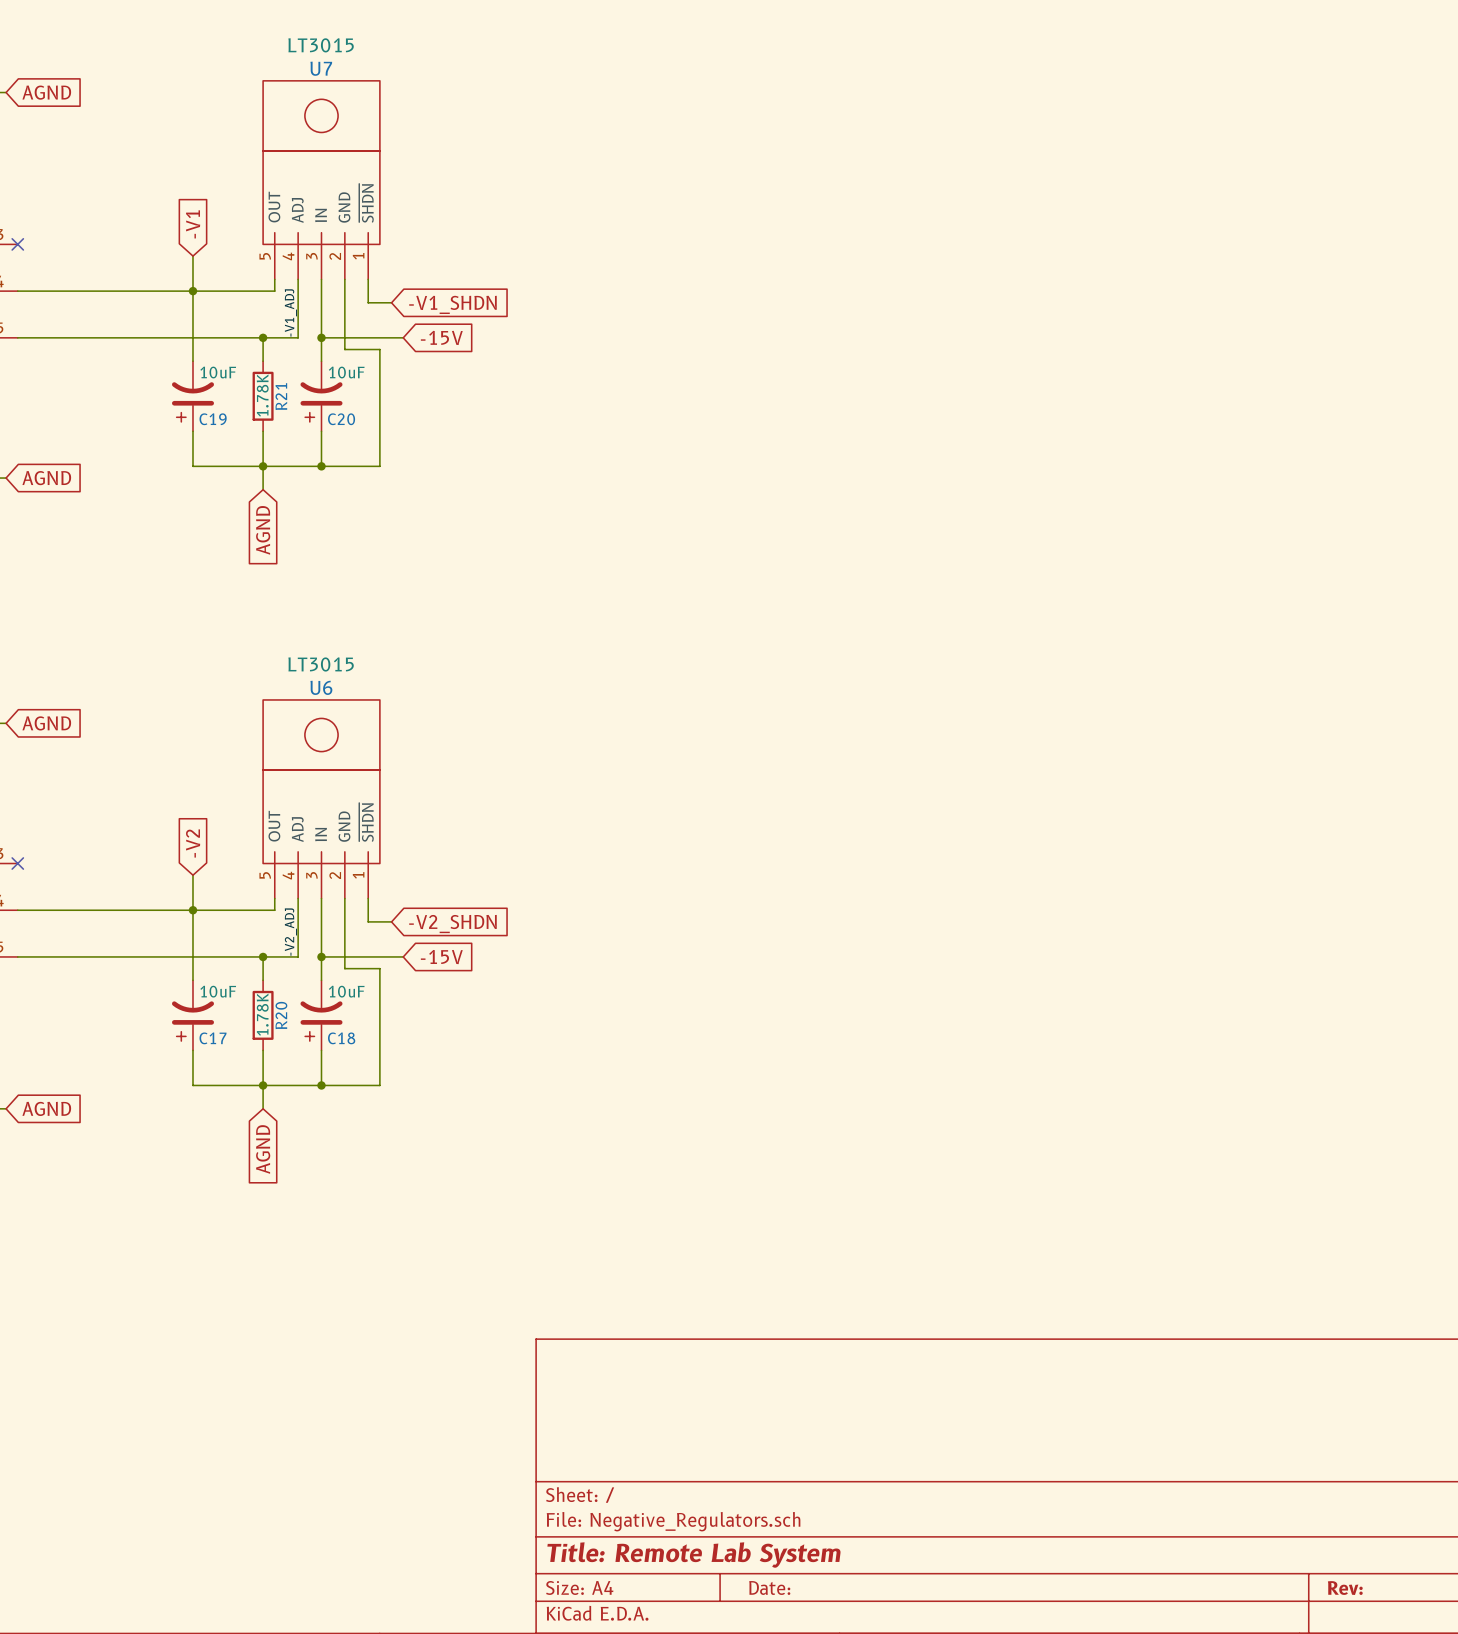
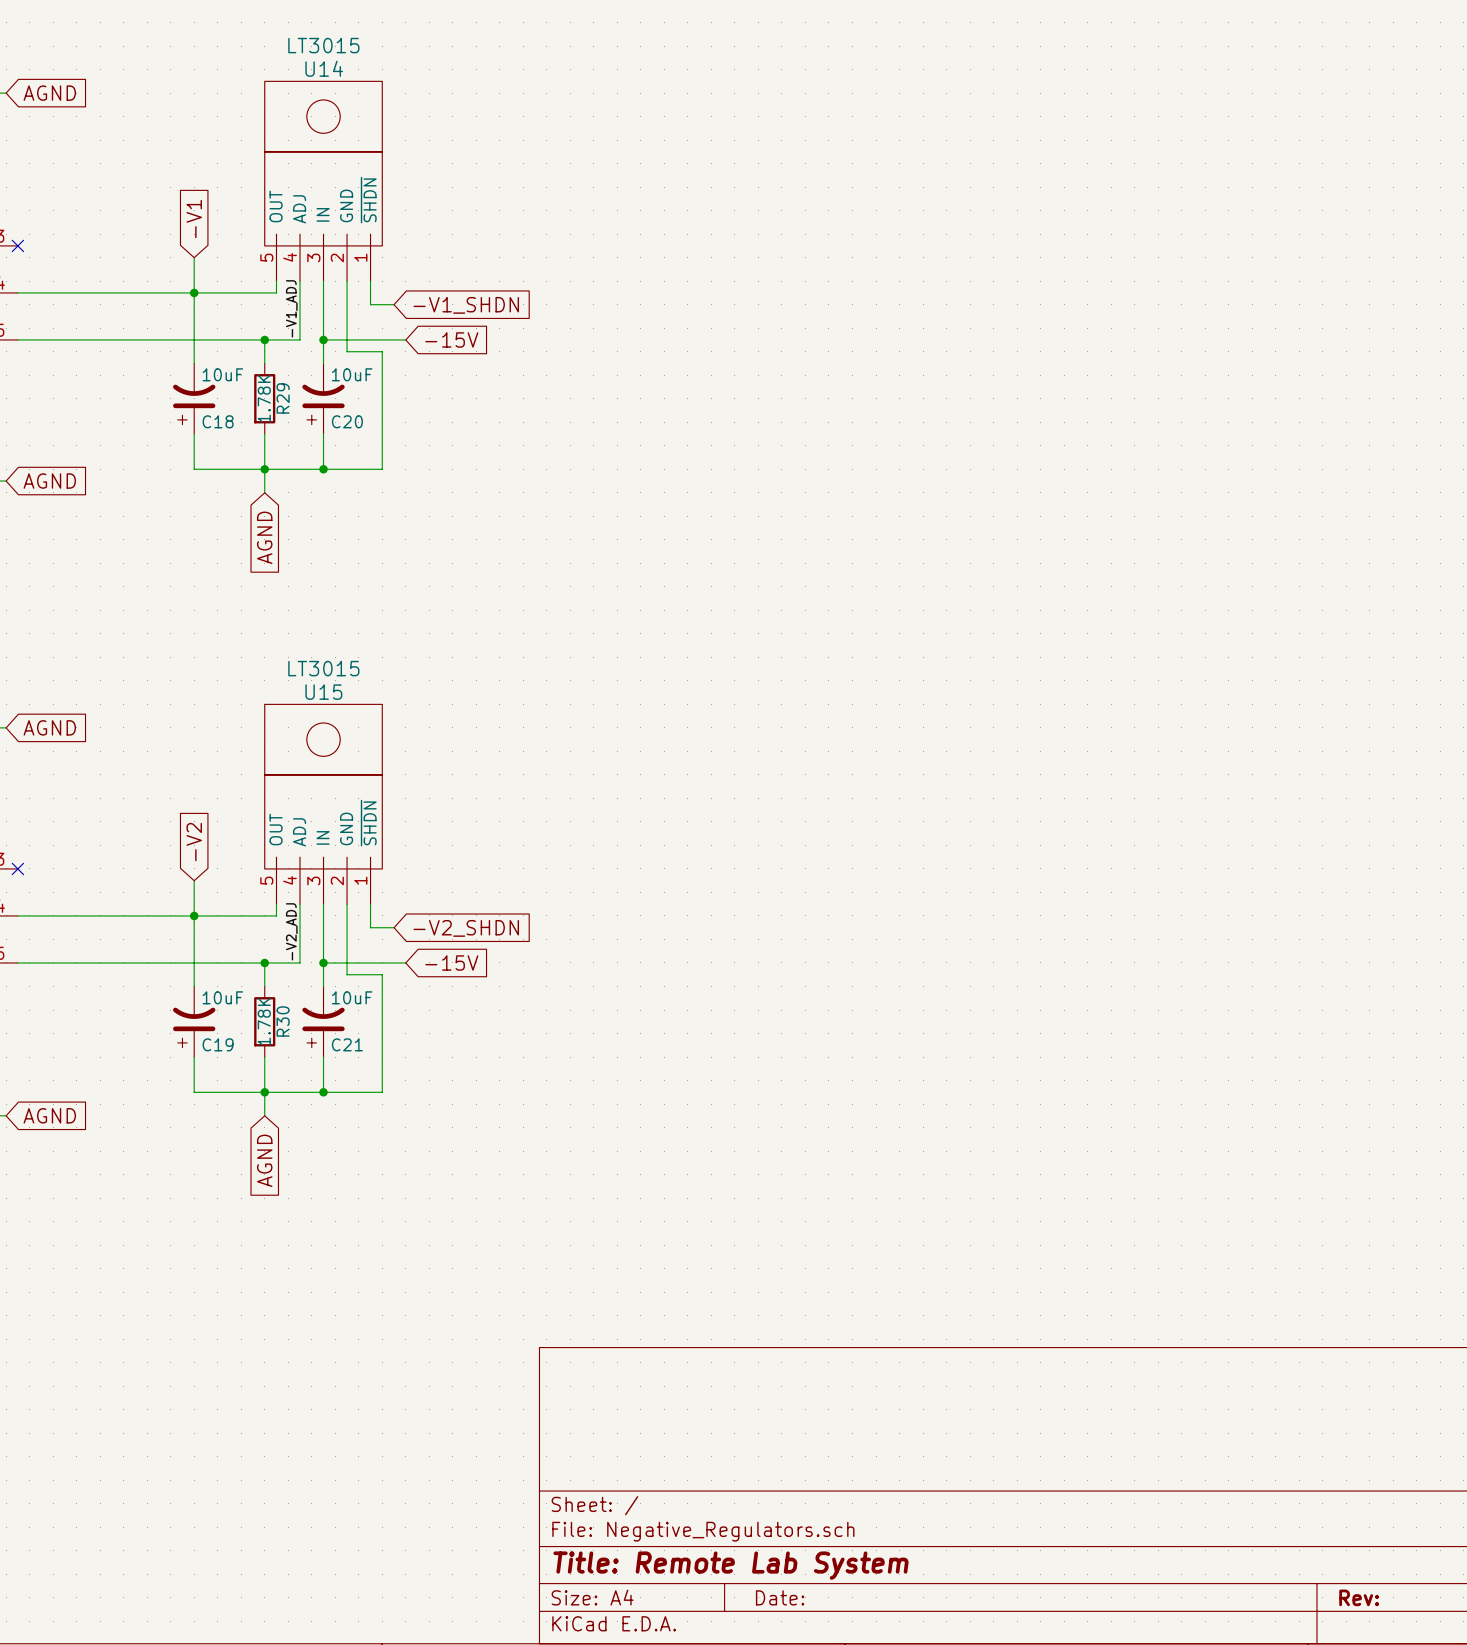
U7 name: U7 (321, 68) -> U14 (324, 68)
R21 name: R21 (281, 396) -> R29 (283, 398)
C19 name: C19 (213, 419) -> C18 (218, 421)
U6 name: U6 (321, 687) -> U15 (323, 692)
R20 name: R20 (281, 1015) -> R30 (283, 1021)
C17 name: C17 (213, 1038) -> C19 (218, 1044)
C18 name: C18 (341, 1038) -> C21 (347, 1044)

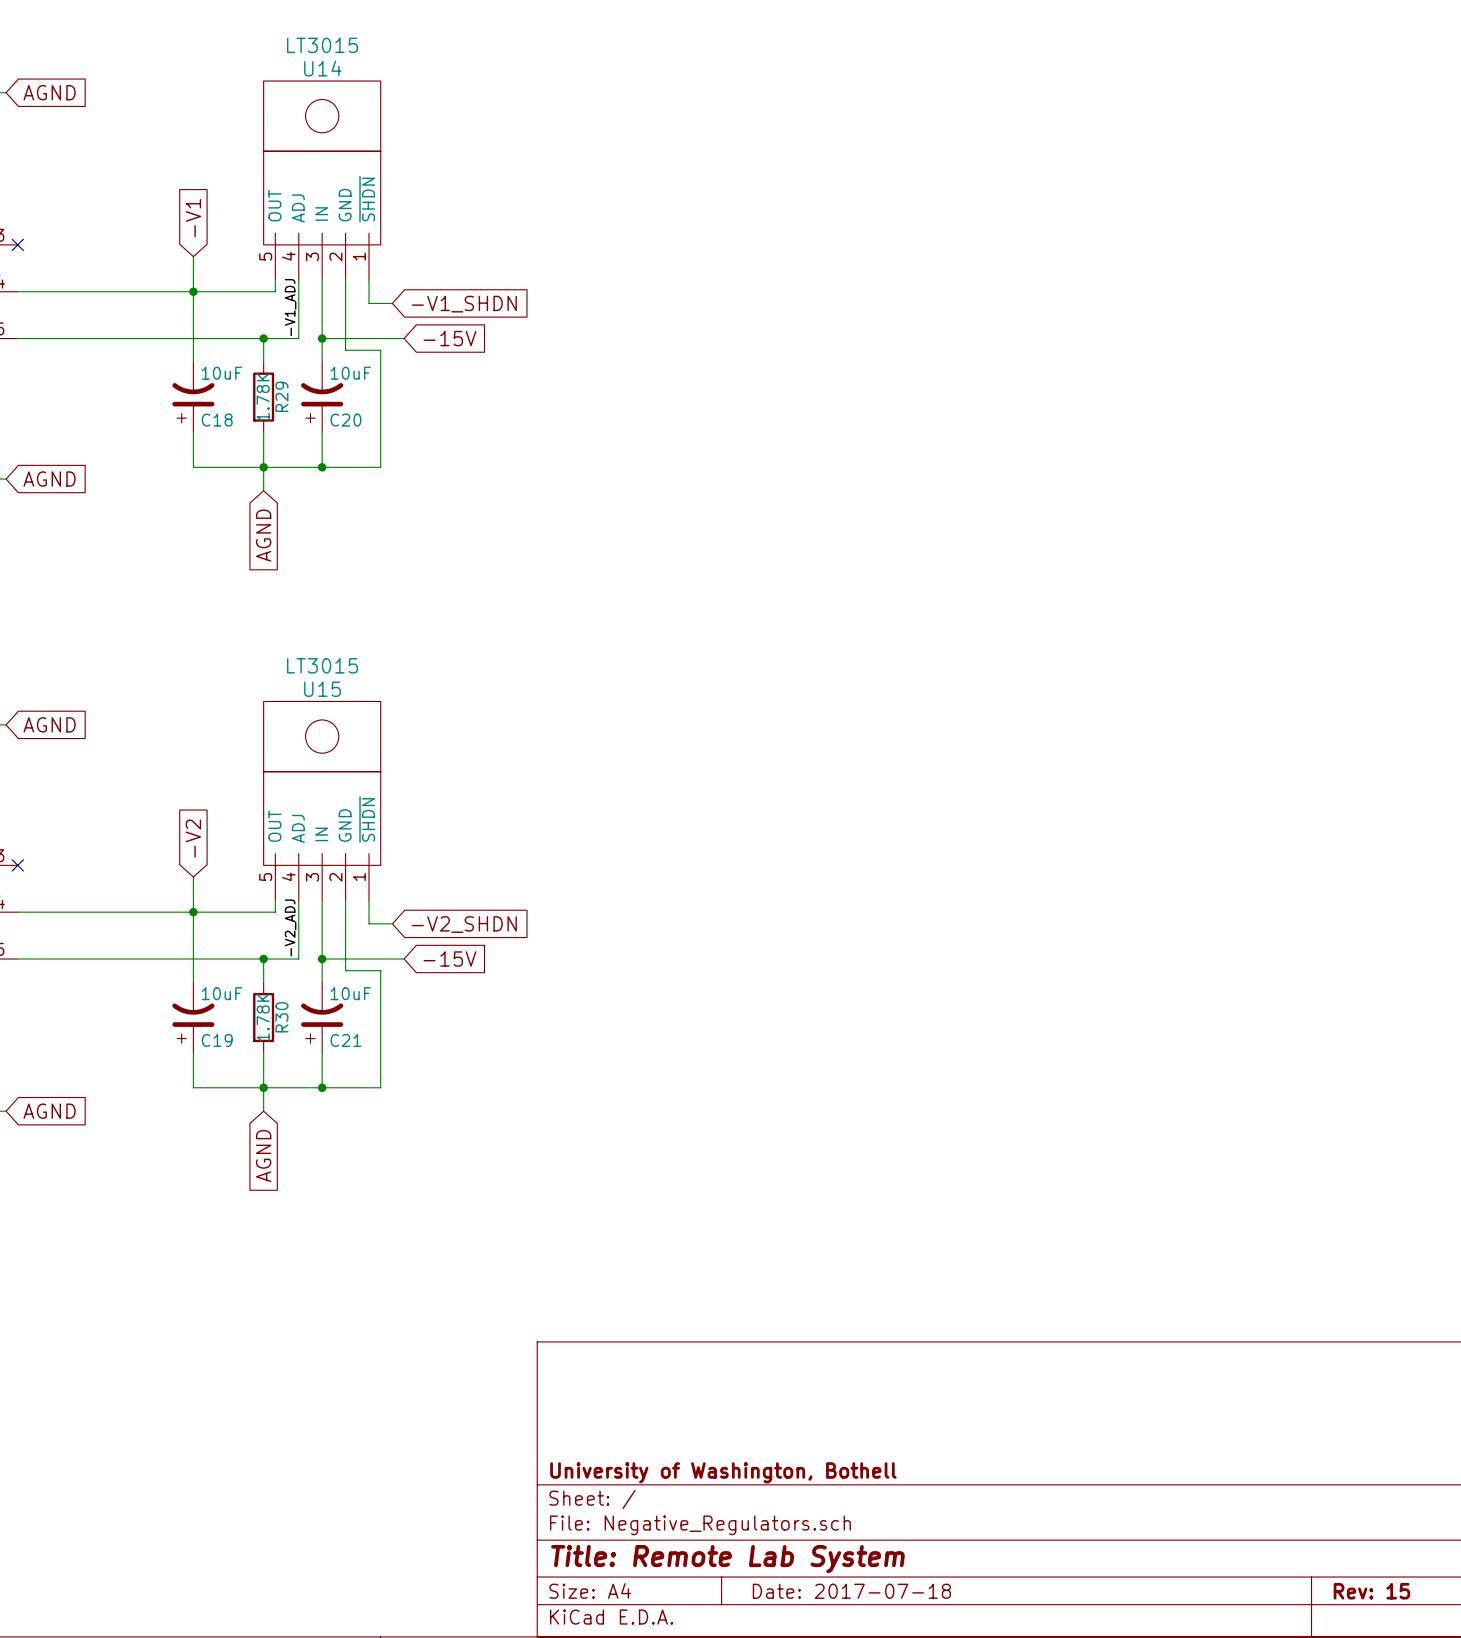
title block: none -> University of Washington, Bothell (723, 1472)
title block: Date: (780, 1597) -> Date: 2017-07-18 (851, 1591)
title block: Rev: (1359, 1597) -> Rev: 15 (1371, 1591)

